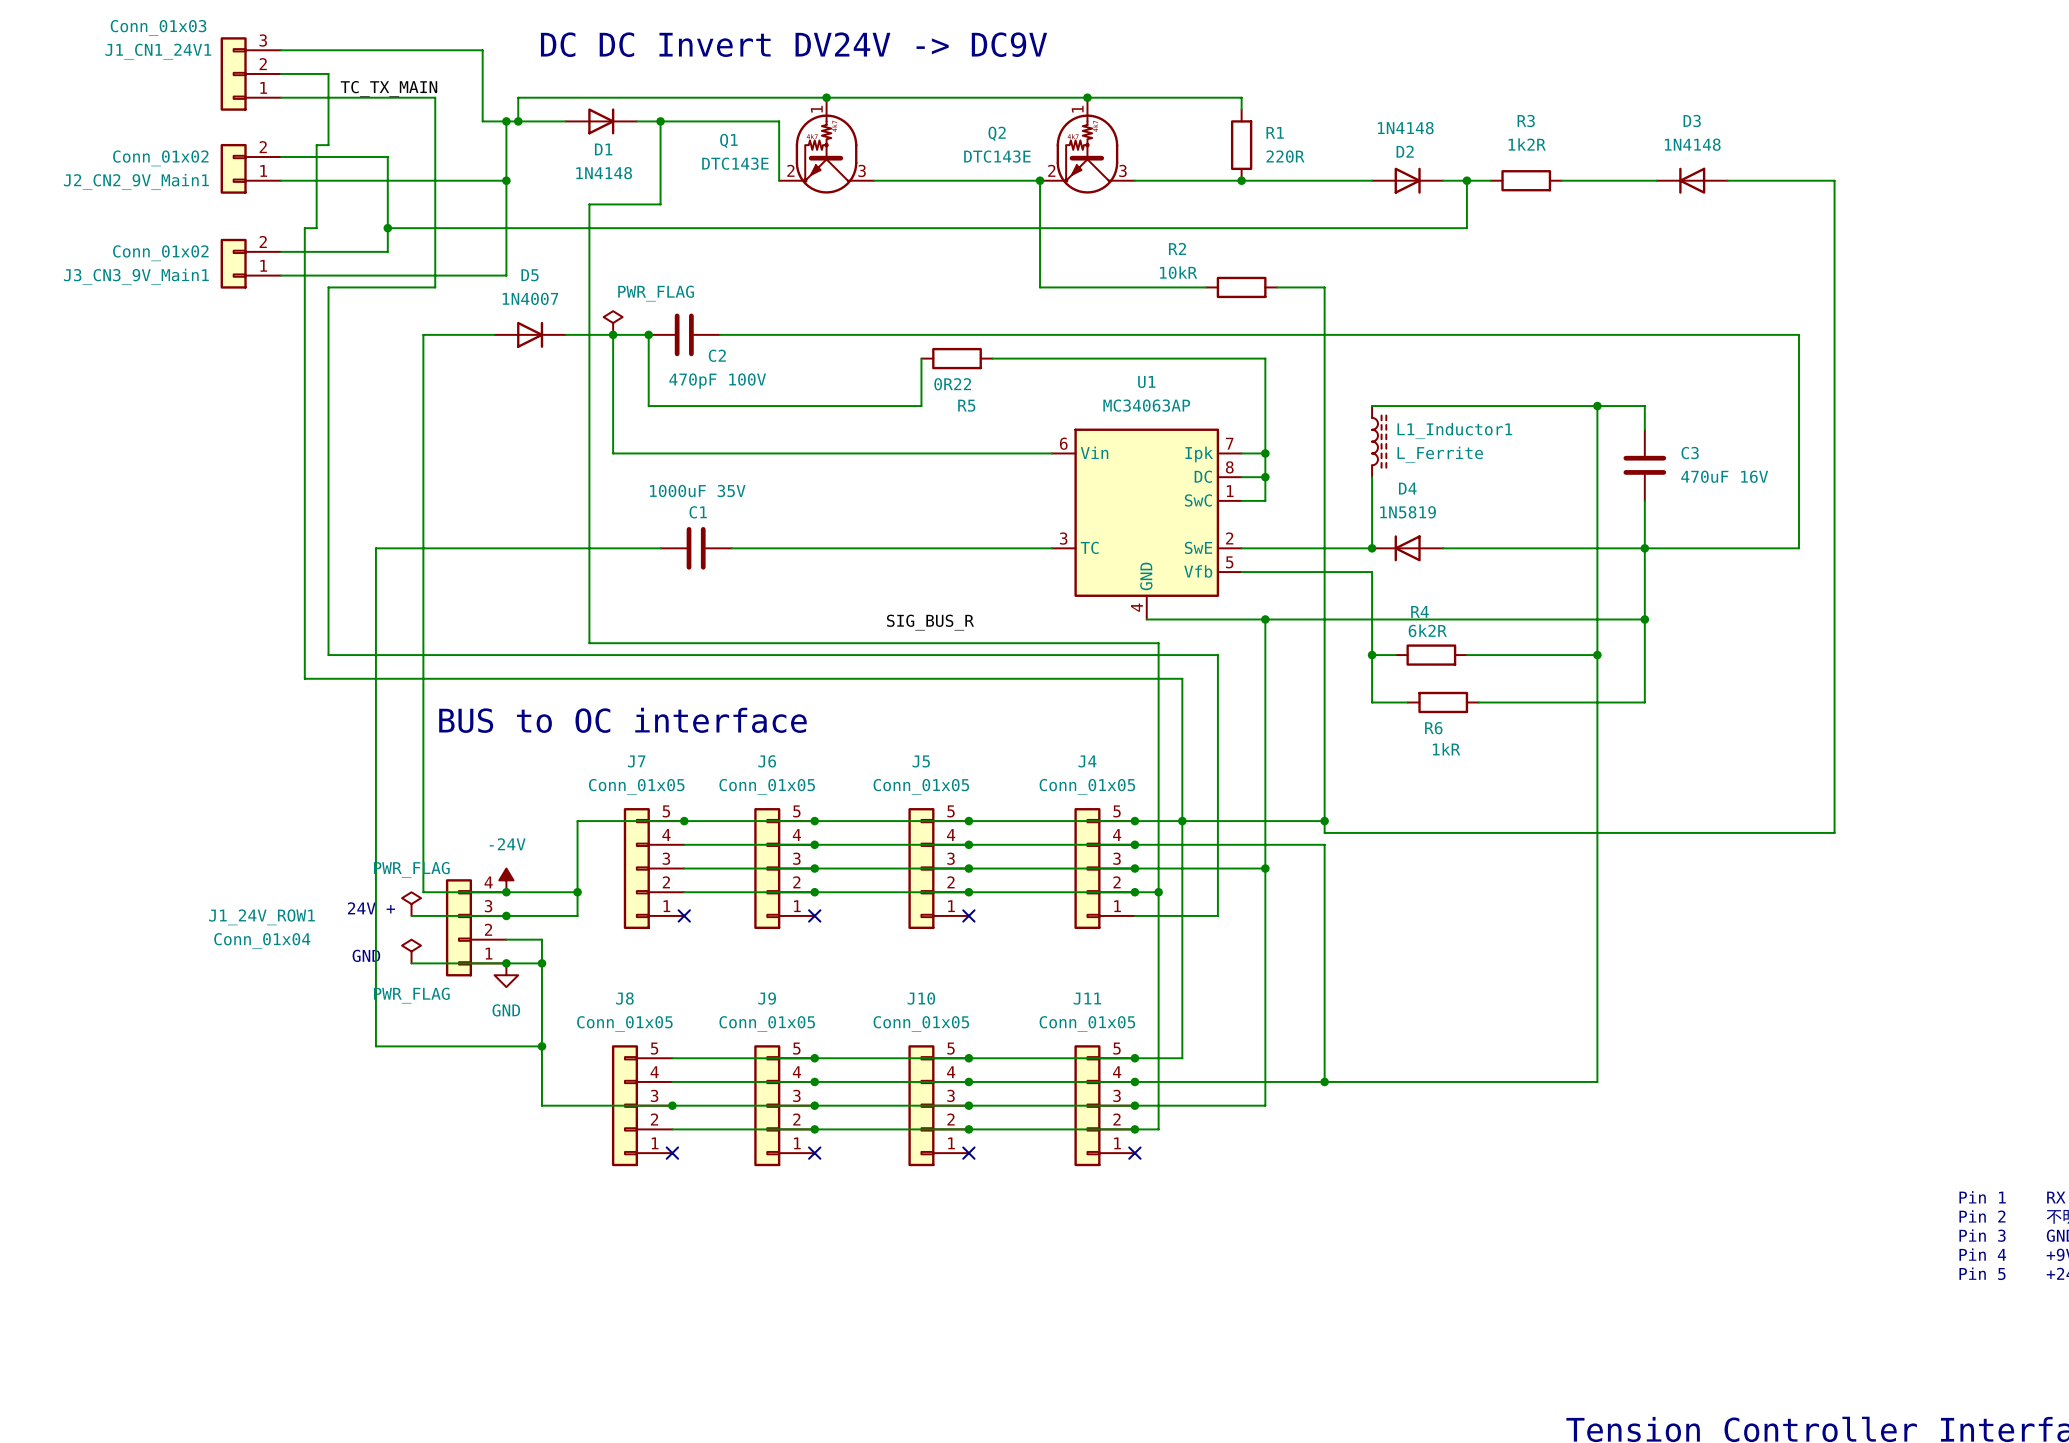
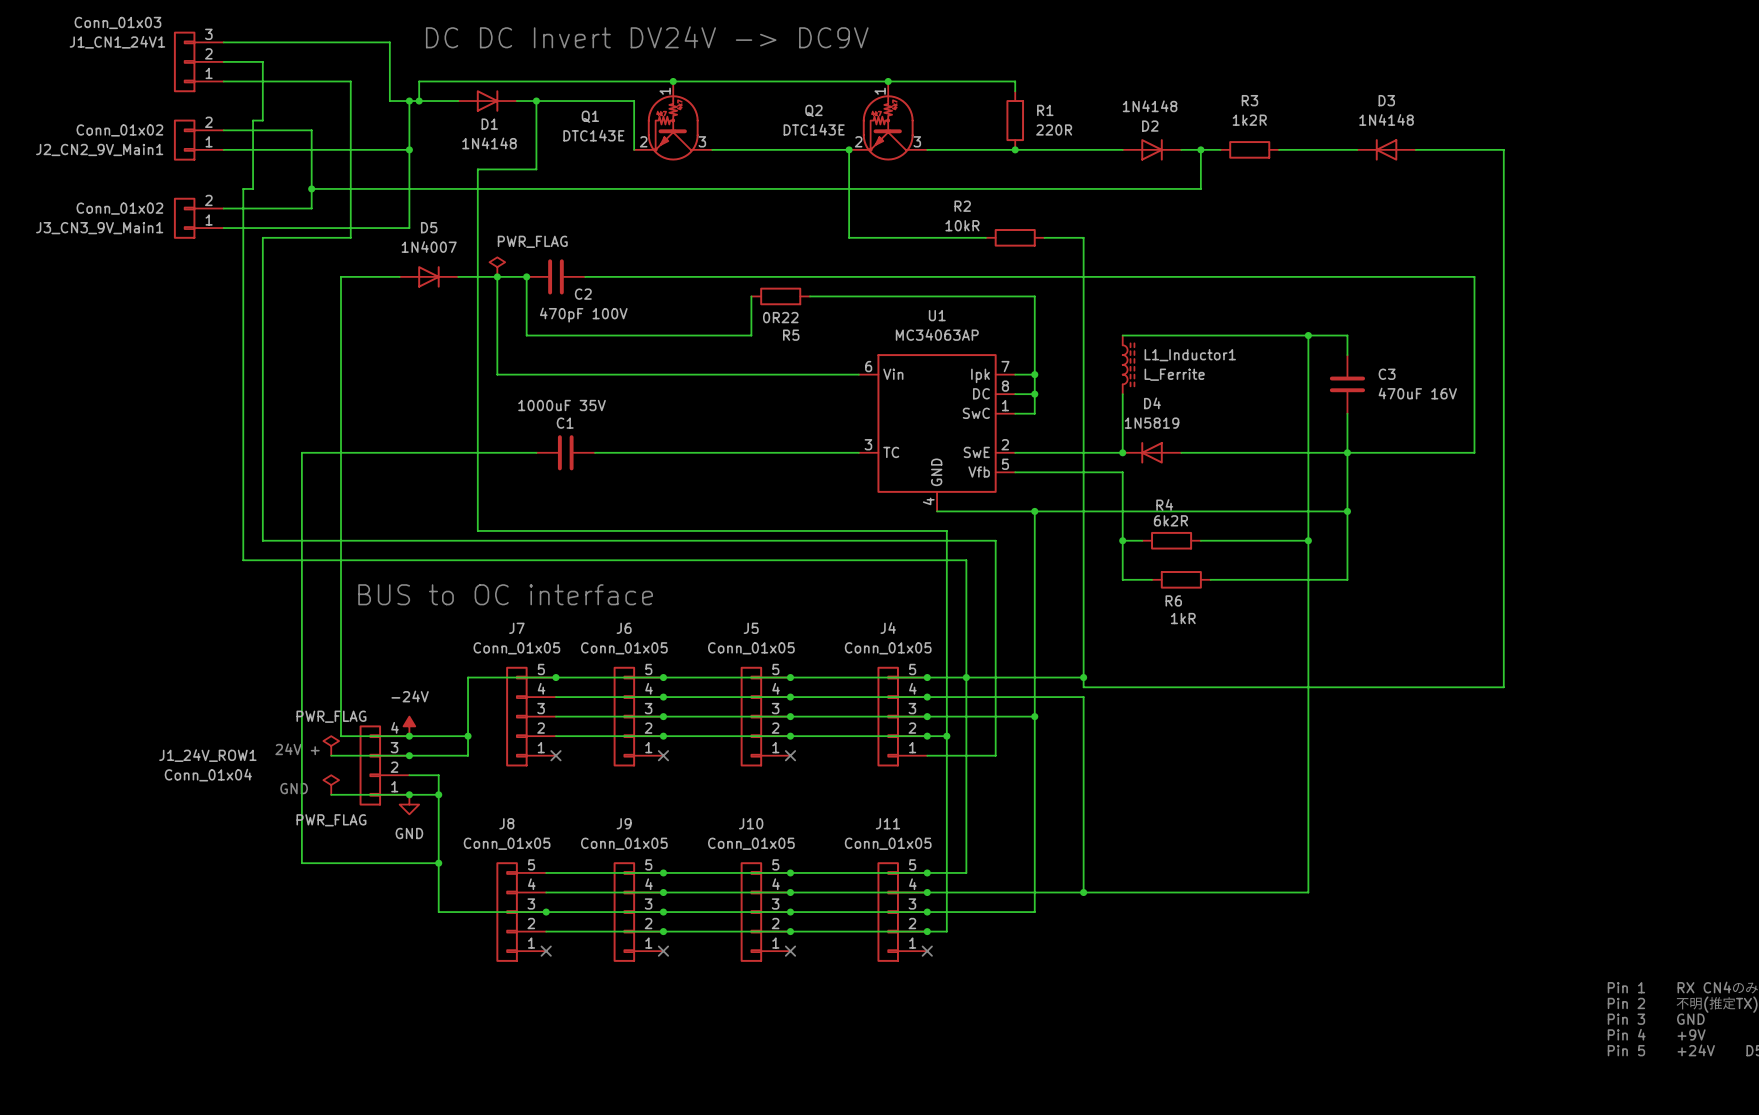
label: TC_TX_MAIN (388, 88) -> none
label: SIG_BUS_R (930, 622) -> none

